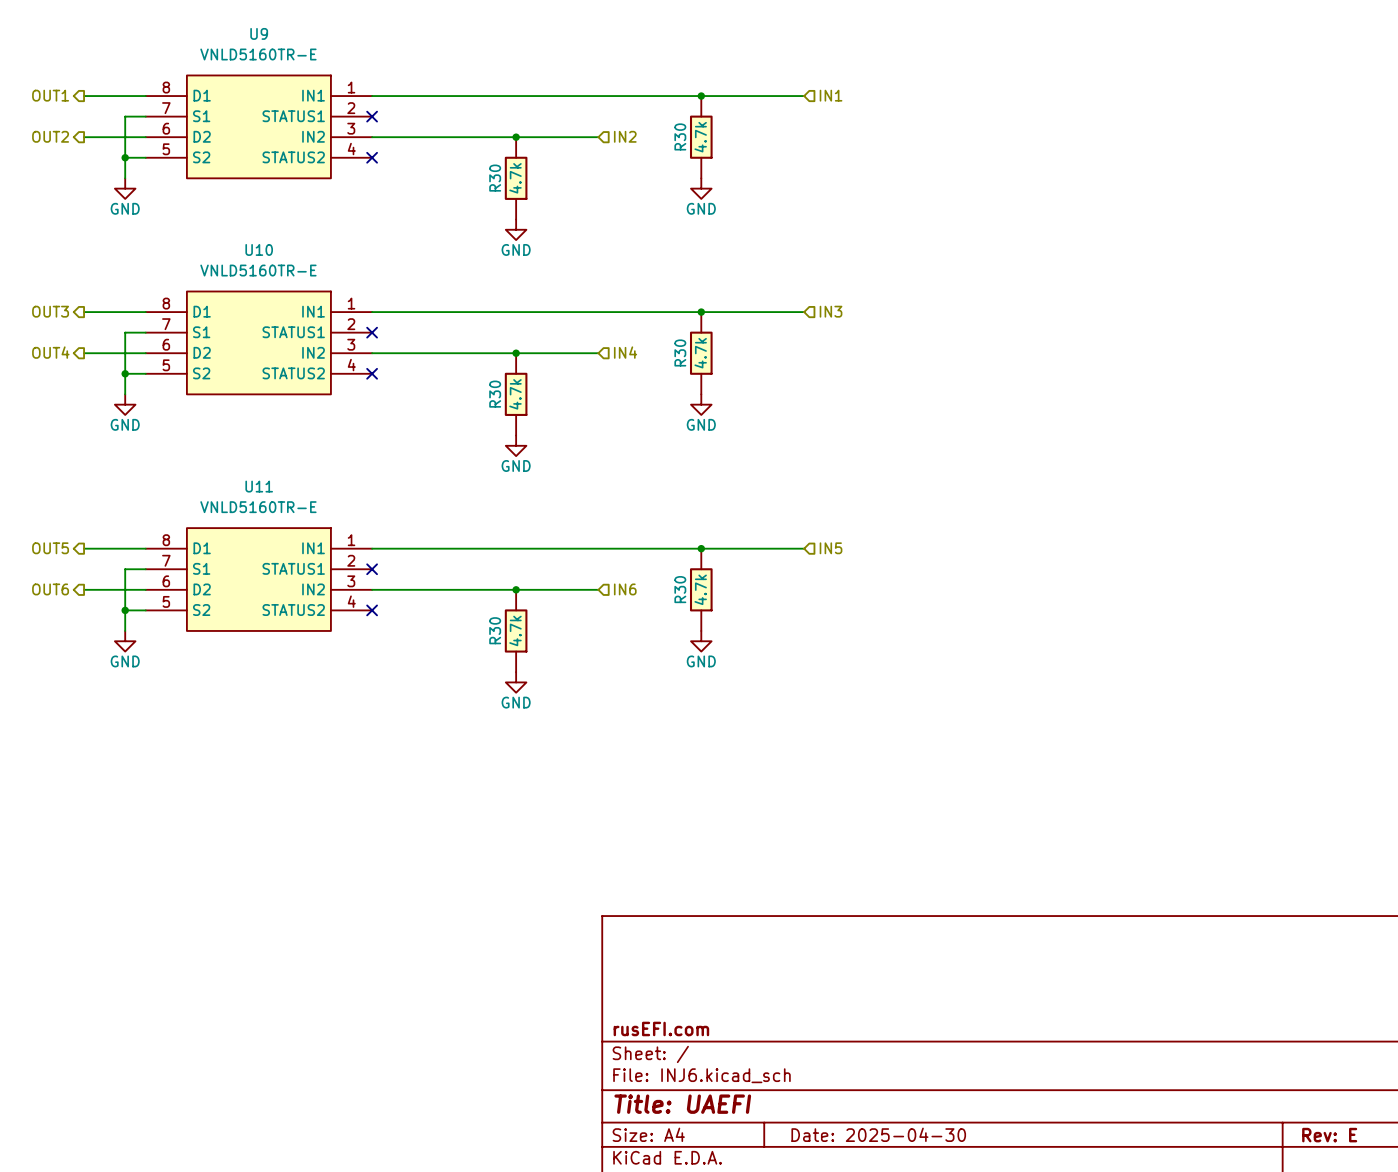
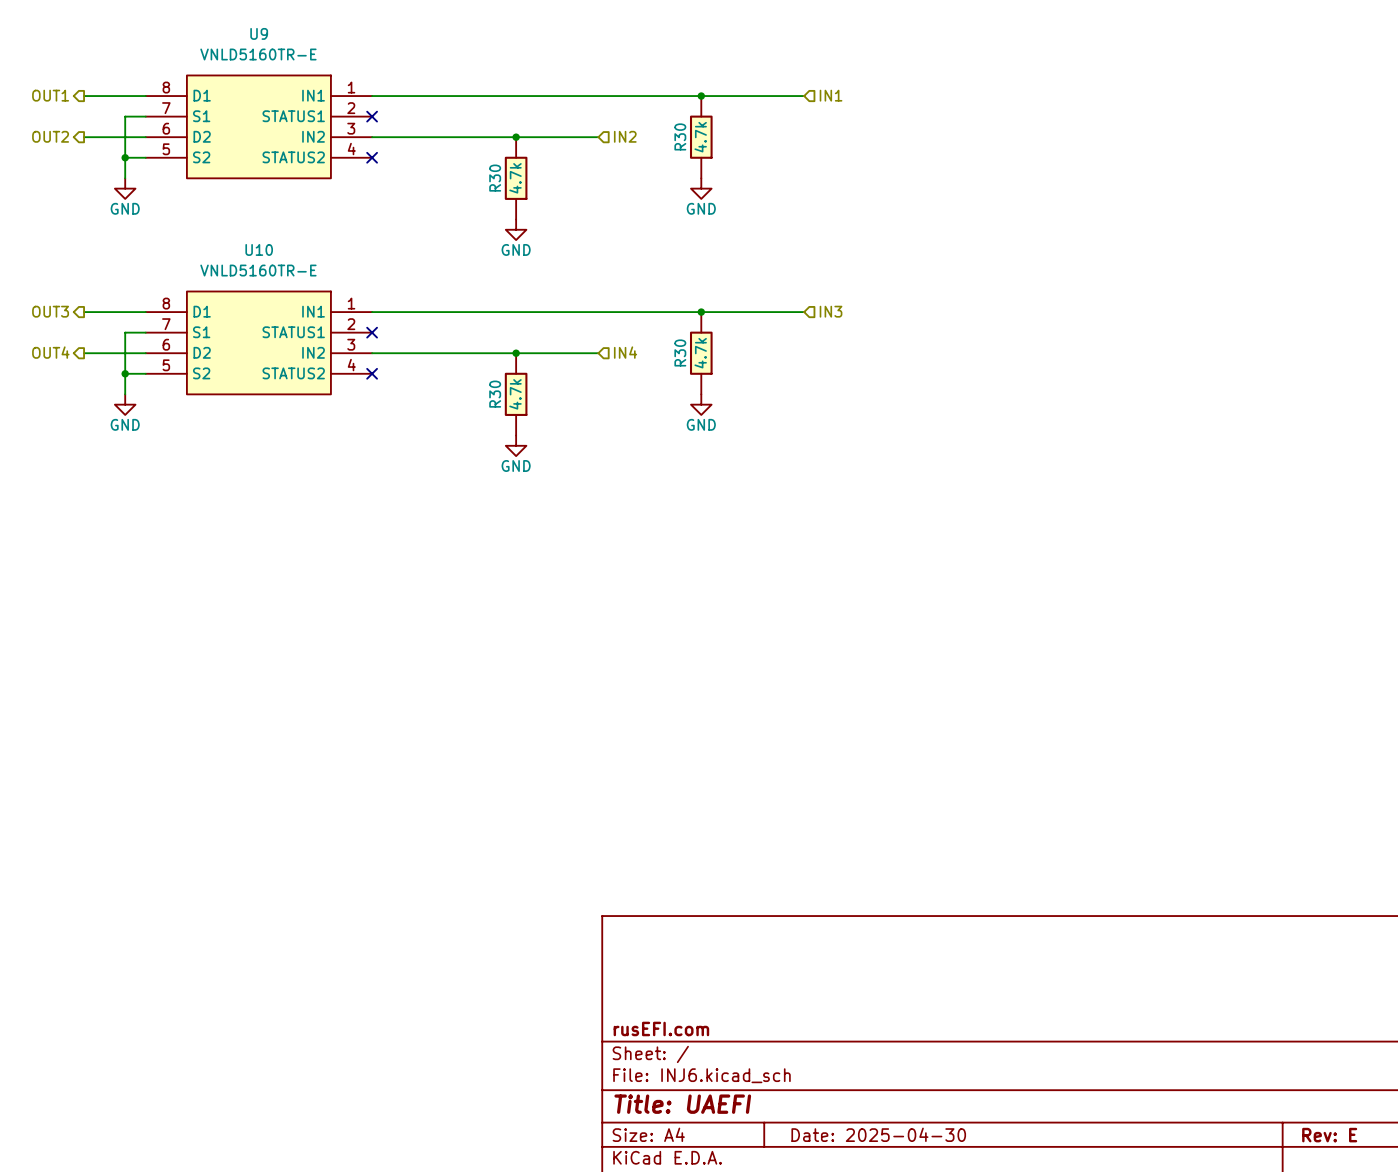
hierarchical label: OUT5 (50, 548) -> none
wire: (84, 548) (145, 548) -> none
wire: (372, 548) (804, 548) -> none
junction: (701, 548) -> none
hierarchical label: IN5 (831, 548) -> none
wire: (145, 569) (125, 569) (125, 630) -> none
no-connect mark: (372, 569) -> none
U11: VNLD5160TR-E (258, 579) -> none
hierarchical label: OUT6 (50, 589) -> none
wire: (84, 589) (145, 589) -> none
wire: (372, 589) (598, 589) -> none
junction: (516, 589) -> none
hierarchical label: IN6 (625, 589) -> none
R30: 4.7k (701, 589) -> none
wire: (125, 610) (145, 610) -> none
junction: (125, 610) -> none
no-connect mark: (372, 610) -> none
R30: 4.7k (516, 630) -> none
power symbol: GND (125, 641) -> none
power symbol: GND (701, 641) -> none
power symbol: GND (516, 682) -> none

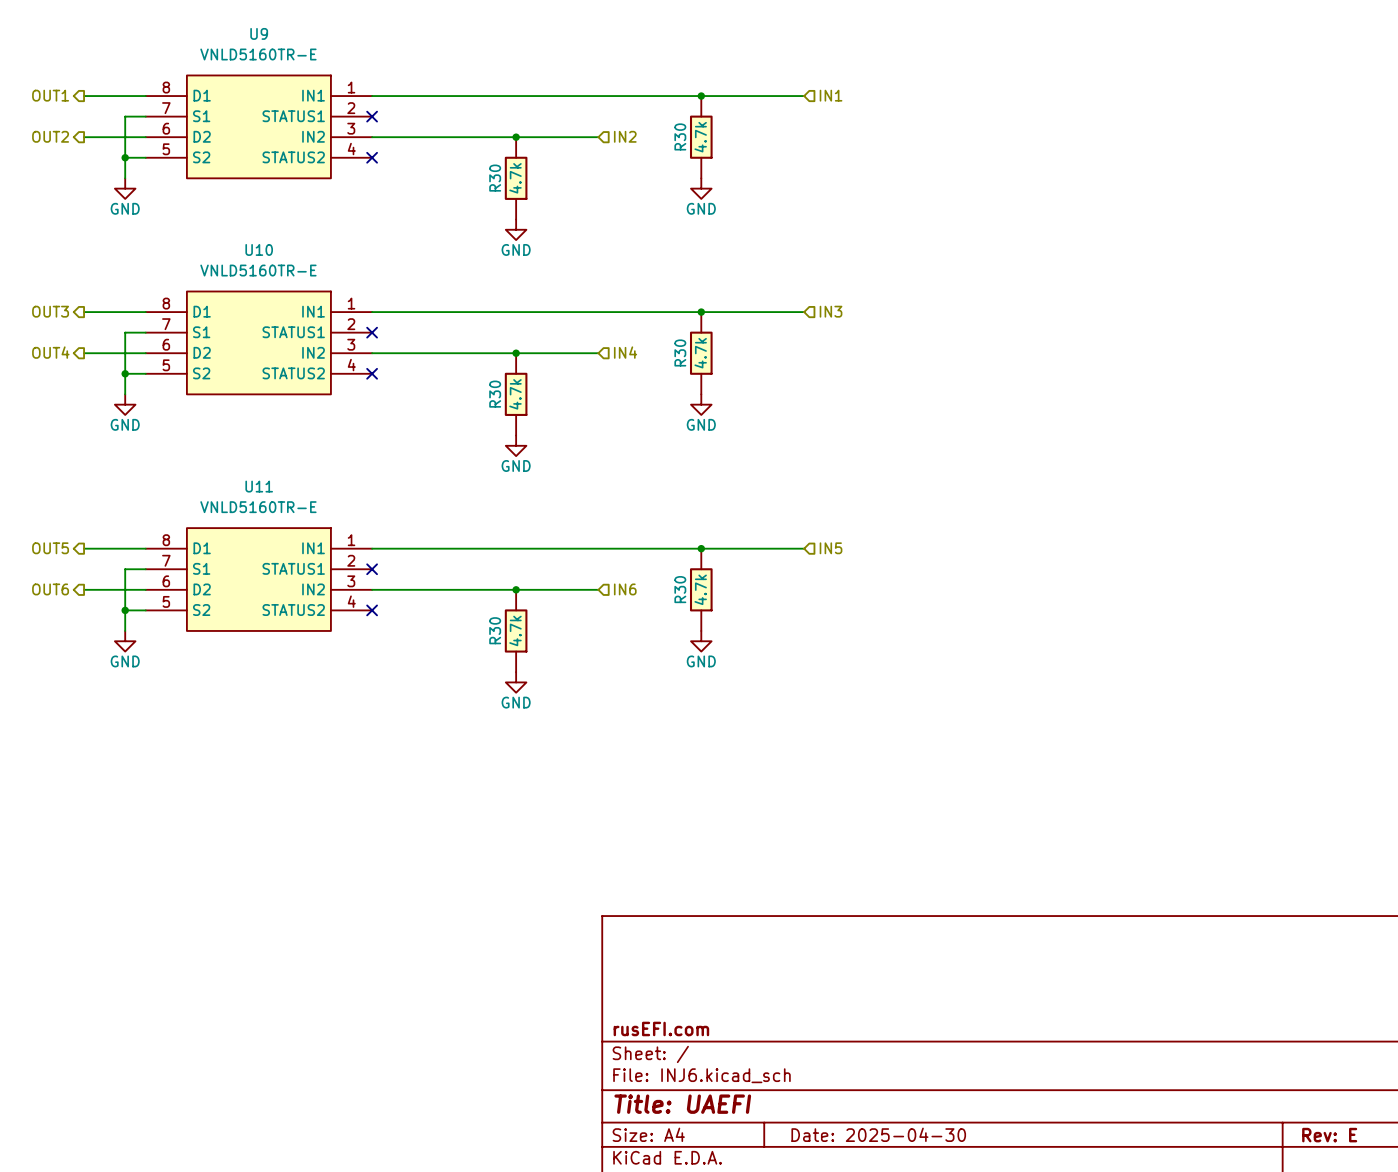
hierarchical label: none -> OUT5 (50, 548)
wire: none -> (84, 548) (145, 548)
wire: none -> (372, 548) (804, 548)
junction: none -> (701, 548)
hierarchical label: none -> IN5 (831, 548)
wire: none -> (145, 569) (125, 569) (125, 630)
no-connect mark: none -> (372, 569)
U11: none -> VNLD5160TR-E (258, 579)
hierarchical label: none -> OUT6 (50, 589)
wire: none -> (84, 589) (145, 589)
wire: none -> (372, 589) (598, 589)
junction: none -> (516, 589)
hierarchical label: none -> IN6 (625, 589)
R30: none -> 4.7k (701, 589)
wire: none -> (125, 610) (145, 610)
junction: none -> (125, 610)
no-connect mark: none -> (372, 610)
R30: none -> 4.7k (516, 630)
power symbol: none -> GND (125, 641)
power symbol: none -> GND (701, 641)
power symbol: none -> GND (516, 682)

